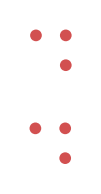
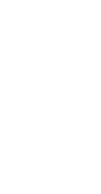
part: (35, 35) -> none
part: (65, 35) -> none
part: (65, 65) -> none
part: (35, 128) -> none
part: (65, 128) -> none
part: (65, 158) -> none

